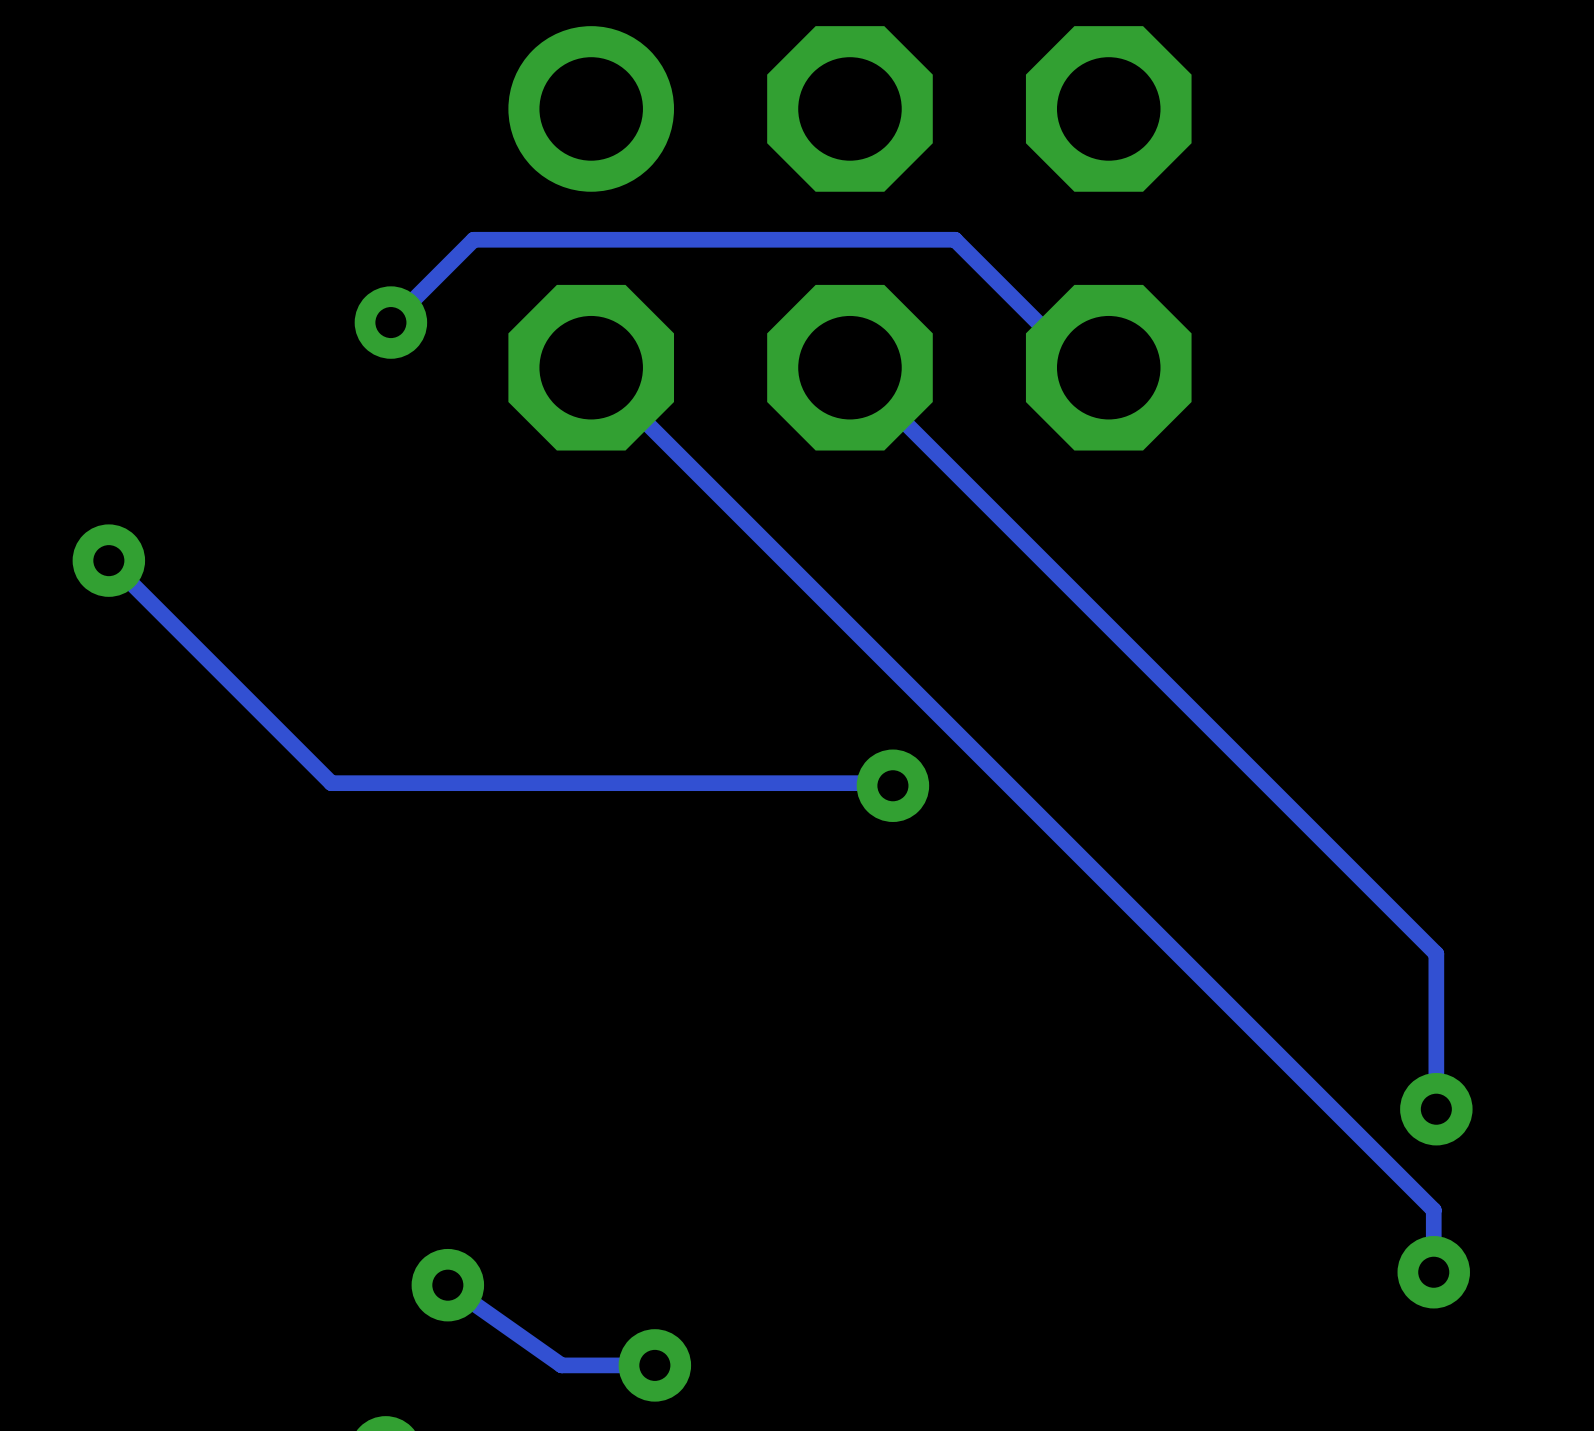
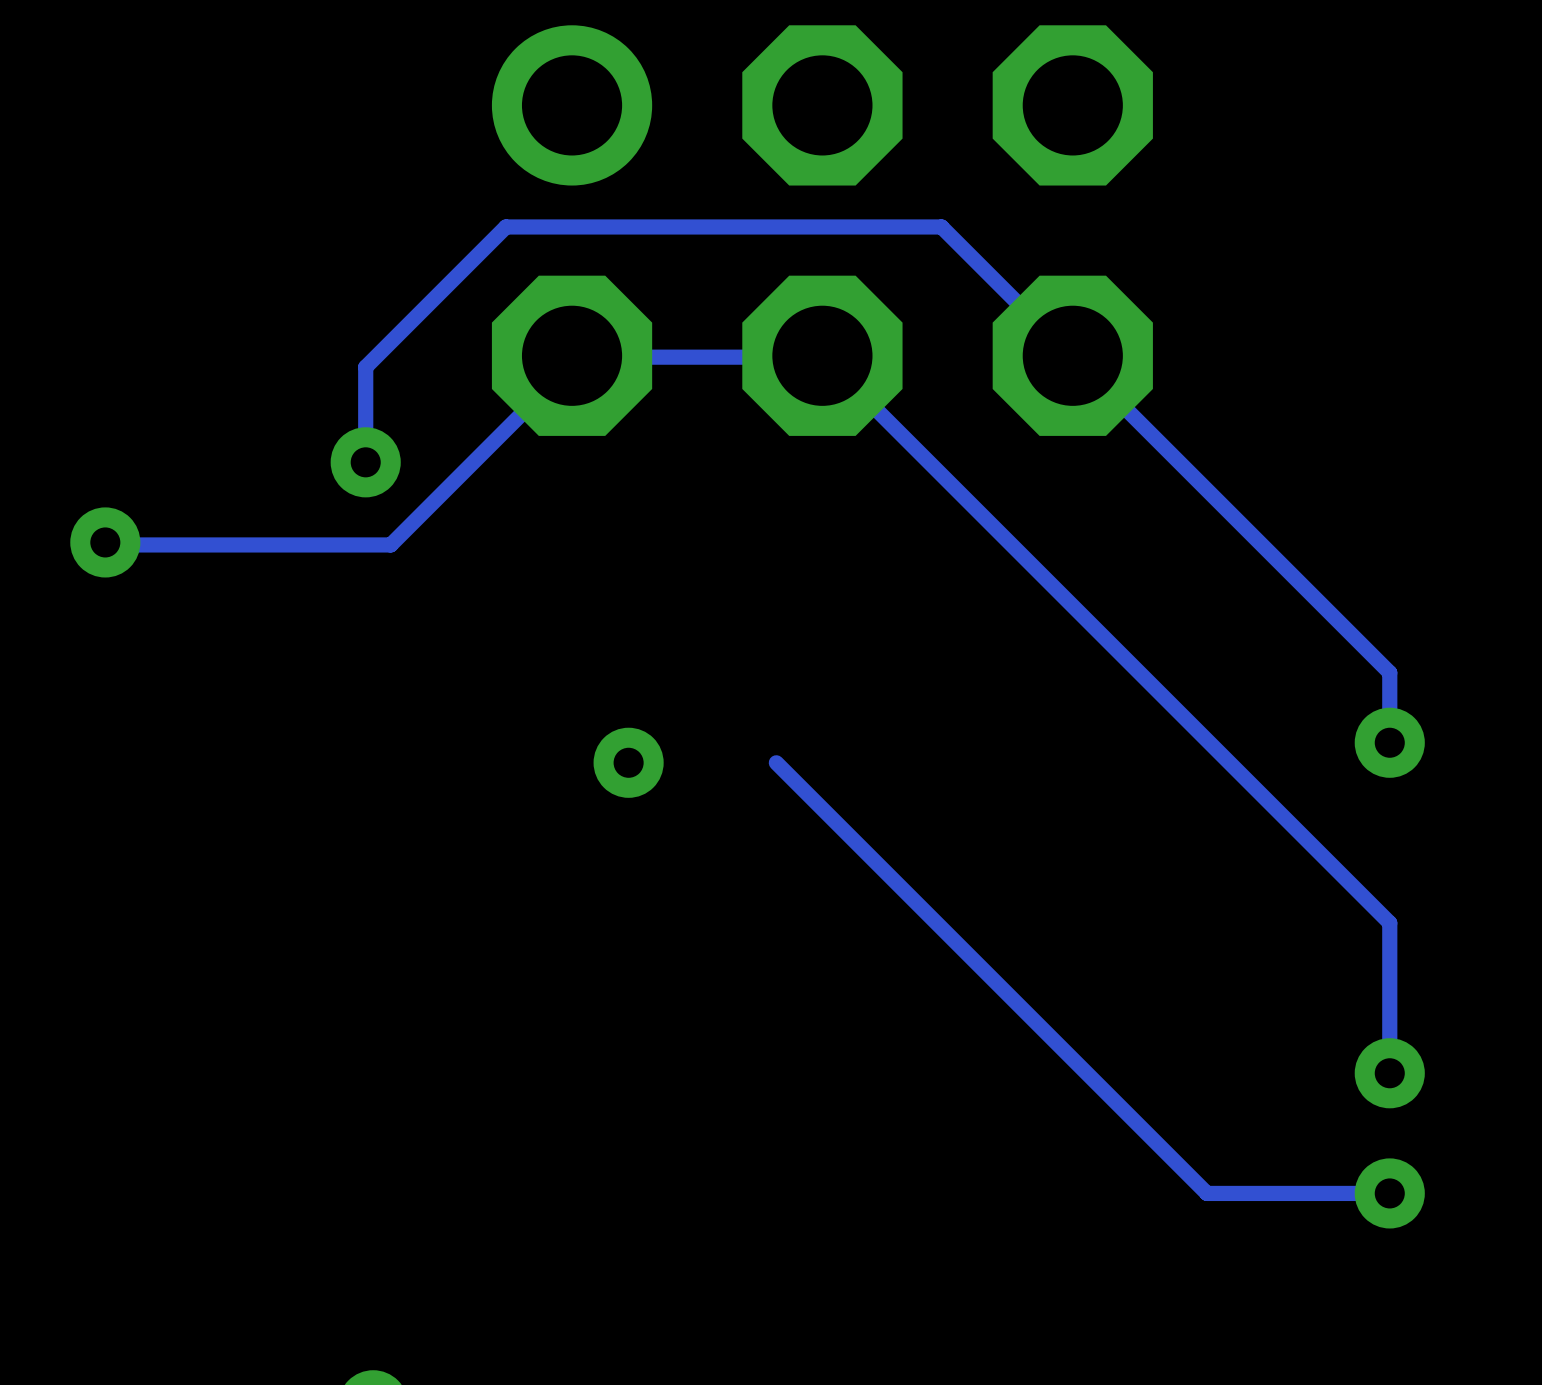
track: (390, 322) (473, 239) (955, 239) (1081, 366) (1110, 366) -> (1389, 742) (1389, 672) (1072, 355)
via position: (390, 322) -> (365, 462)
track: none -> (1069, 354) (941, 226) (505, 226) (365, 367) (365, 462)
track: (595, 371) (1433, 1210) (1433, 1272) -> none
track: (111, 563) (331, 783) (892, 783) -> (107, 544) (390, 544) (578, 357) (823, 357)
via: none -> (1389, 742)
via position: (892, 785) -> (628, 762)
track: none -> (776, 762) (1207, 1193) (1389, 1193)
via position: (1433, 1272) -> (1389, 1193)
track: (447, 1285) (561, 1365) (654, 1365) -> none
via: (447, 1285) -> none
via: (654, 1365) -> none

